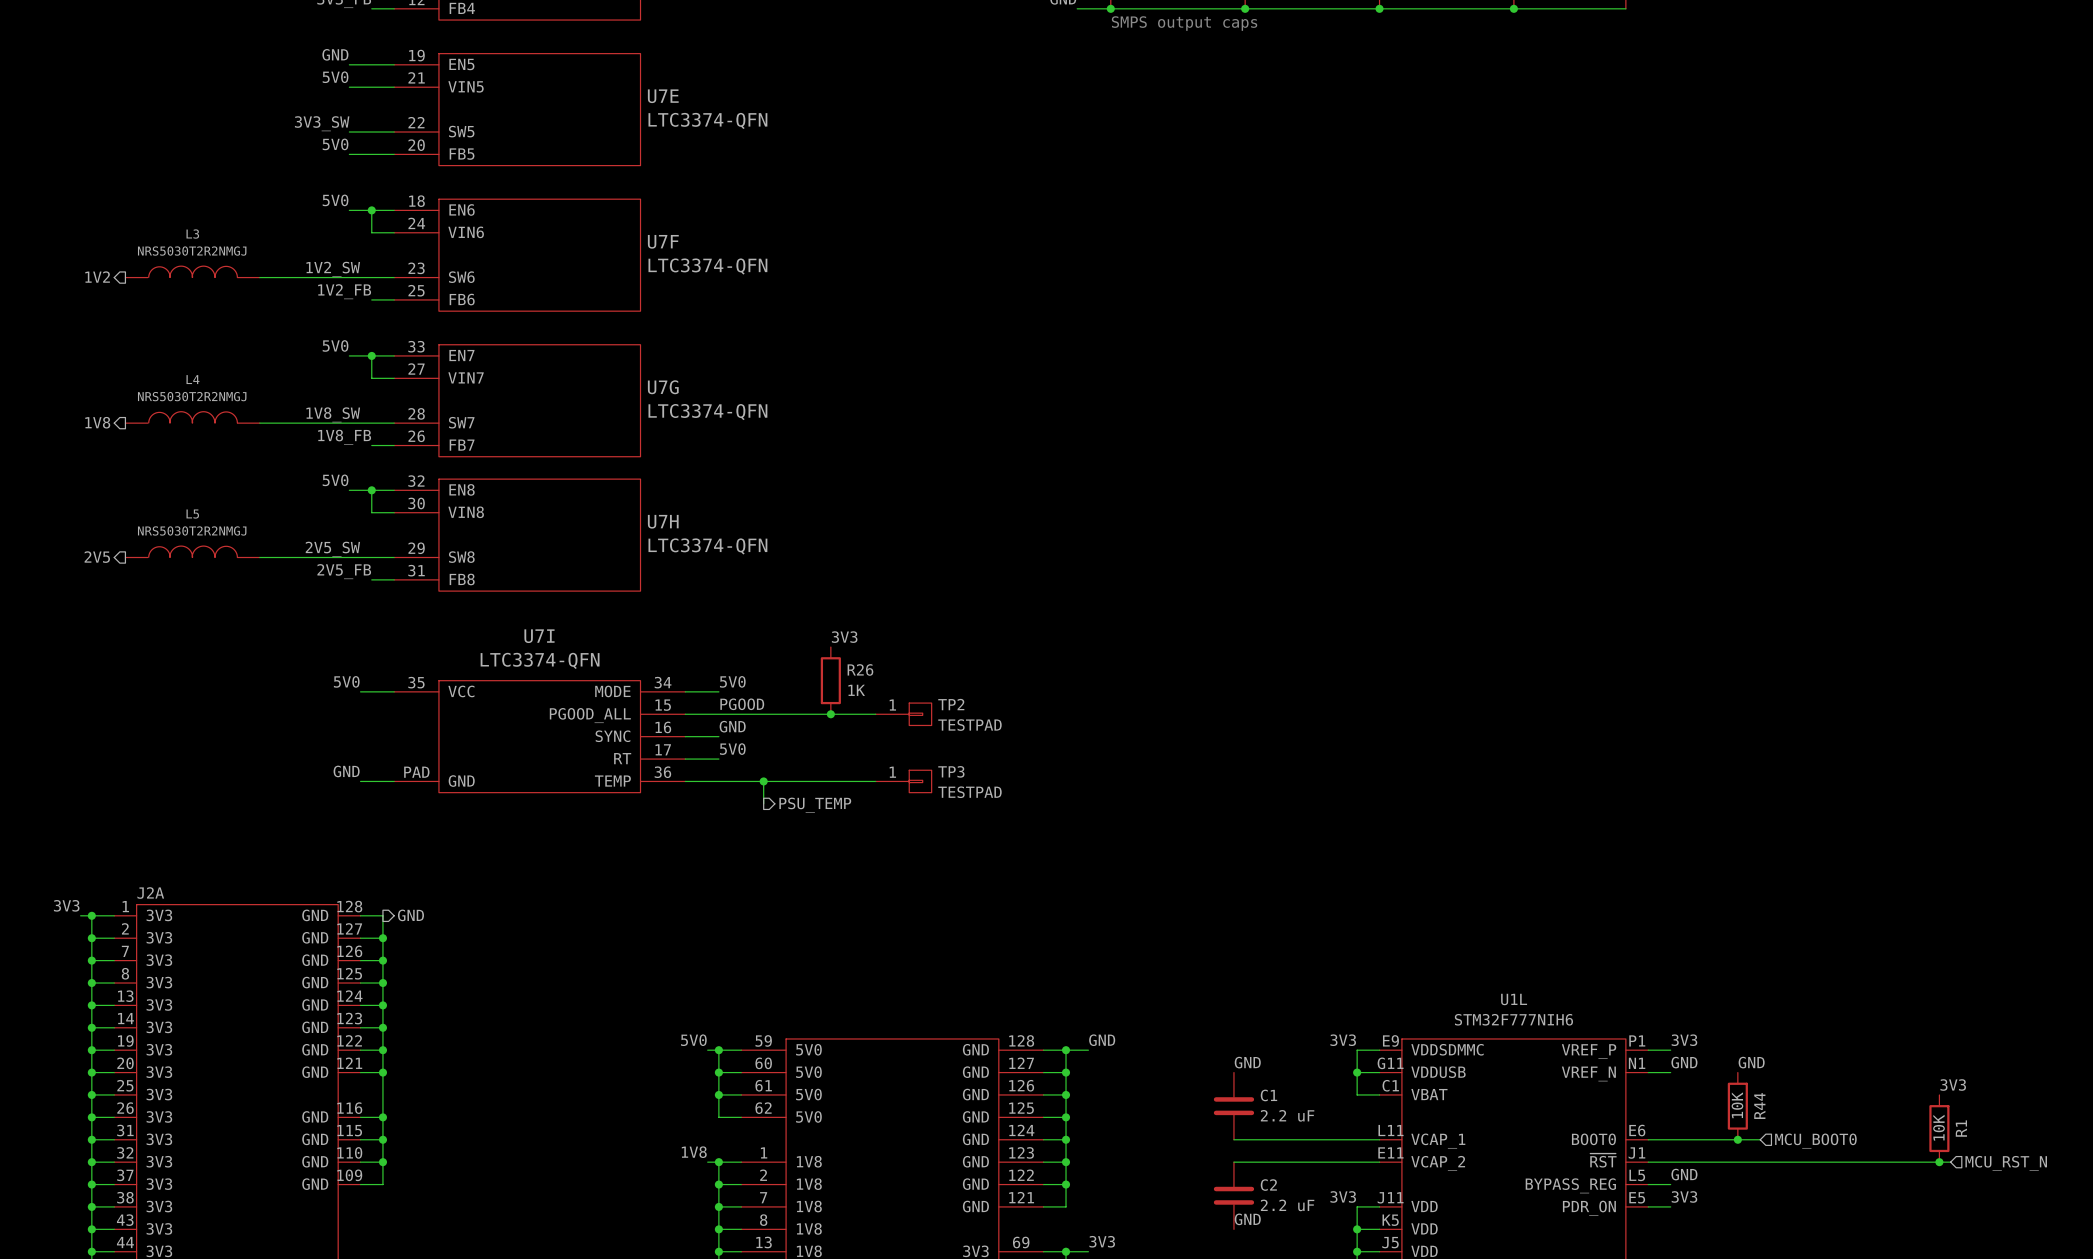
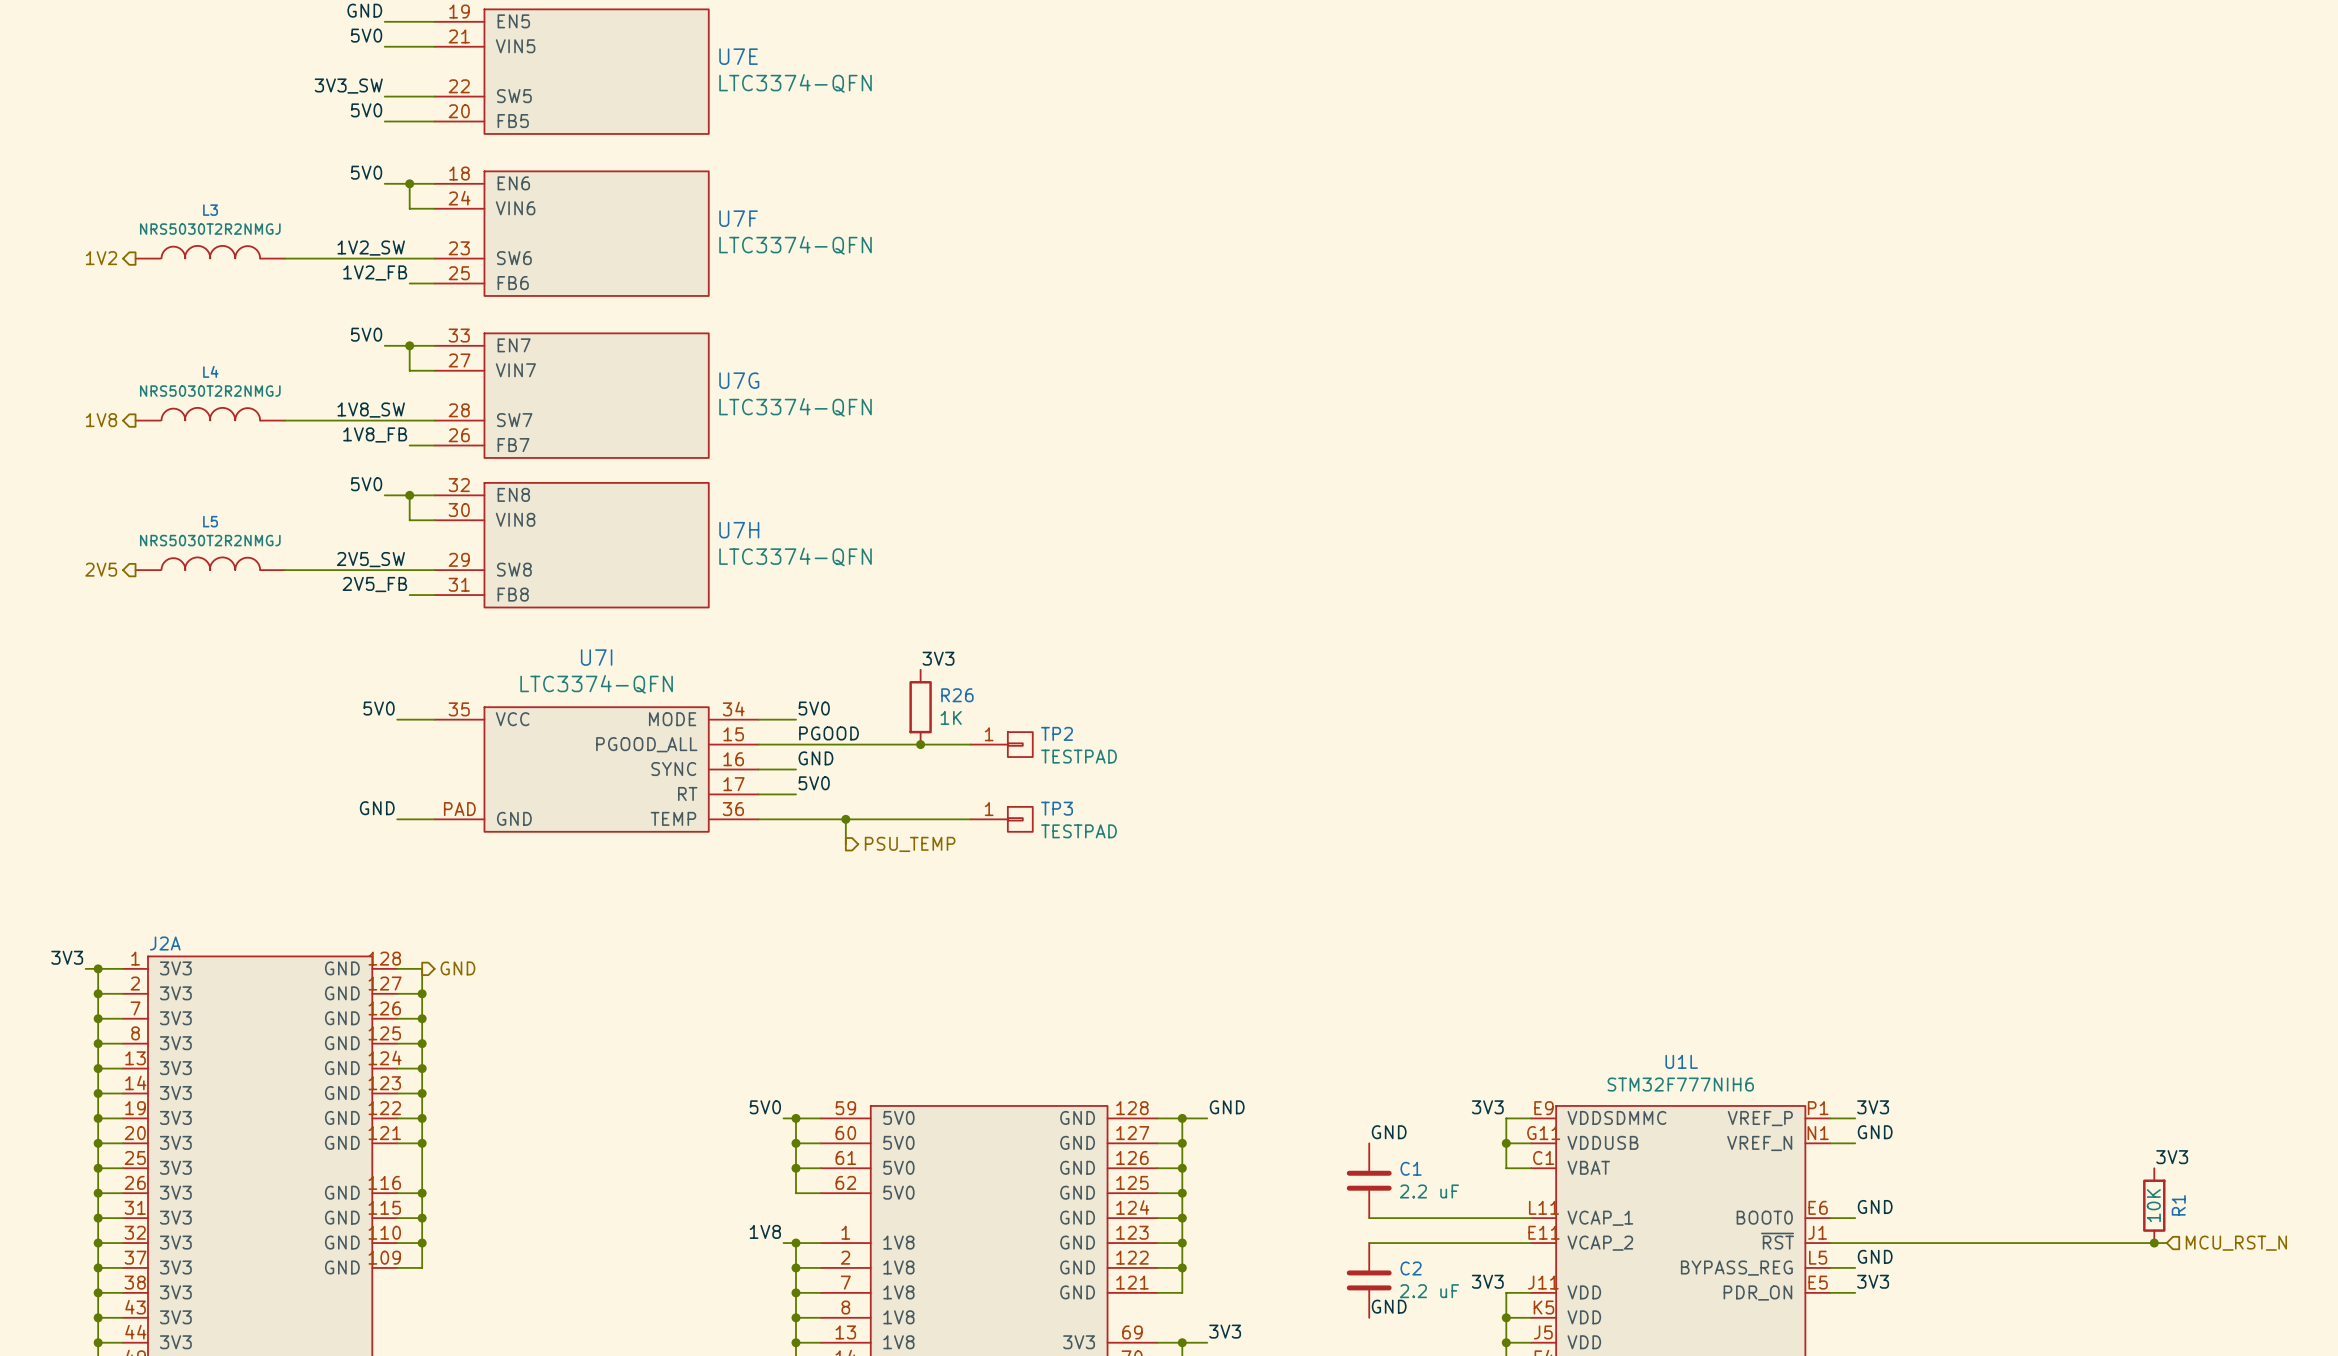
label position: GND (1751, 1062) -> GND (1875, 1206)
R44: 10K (1737, 1106) -> none
wire: (1670, 1139) (1760, 1139) -> none
junction: (1737, 1139) -> none
hierarchical label: MCU_BOOT0 (1815, 1141) -> none

